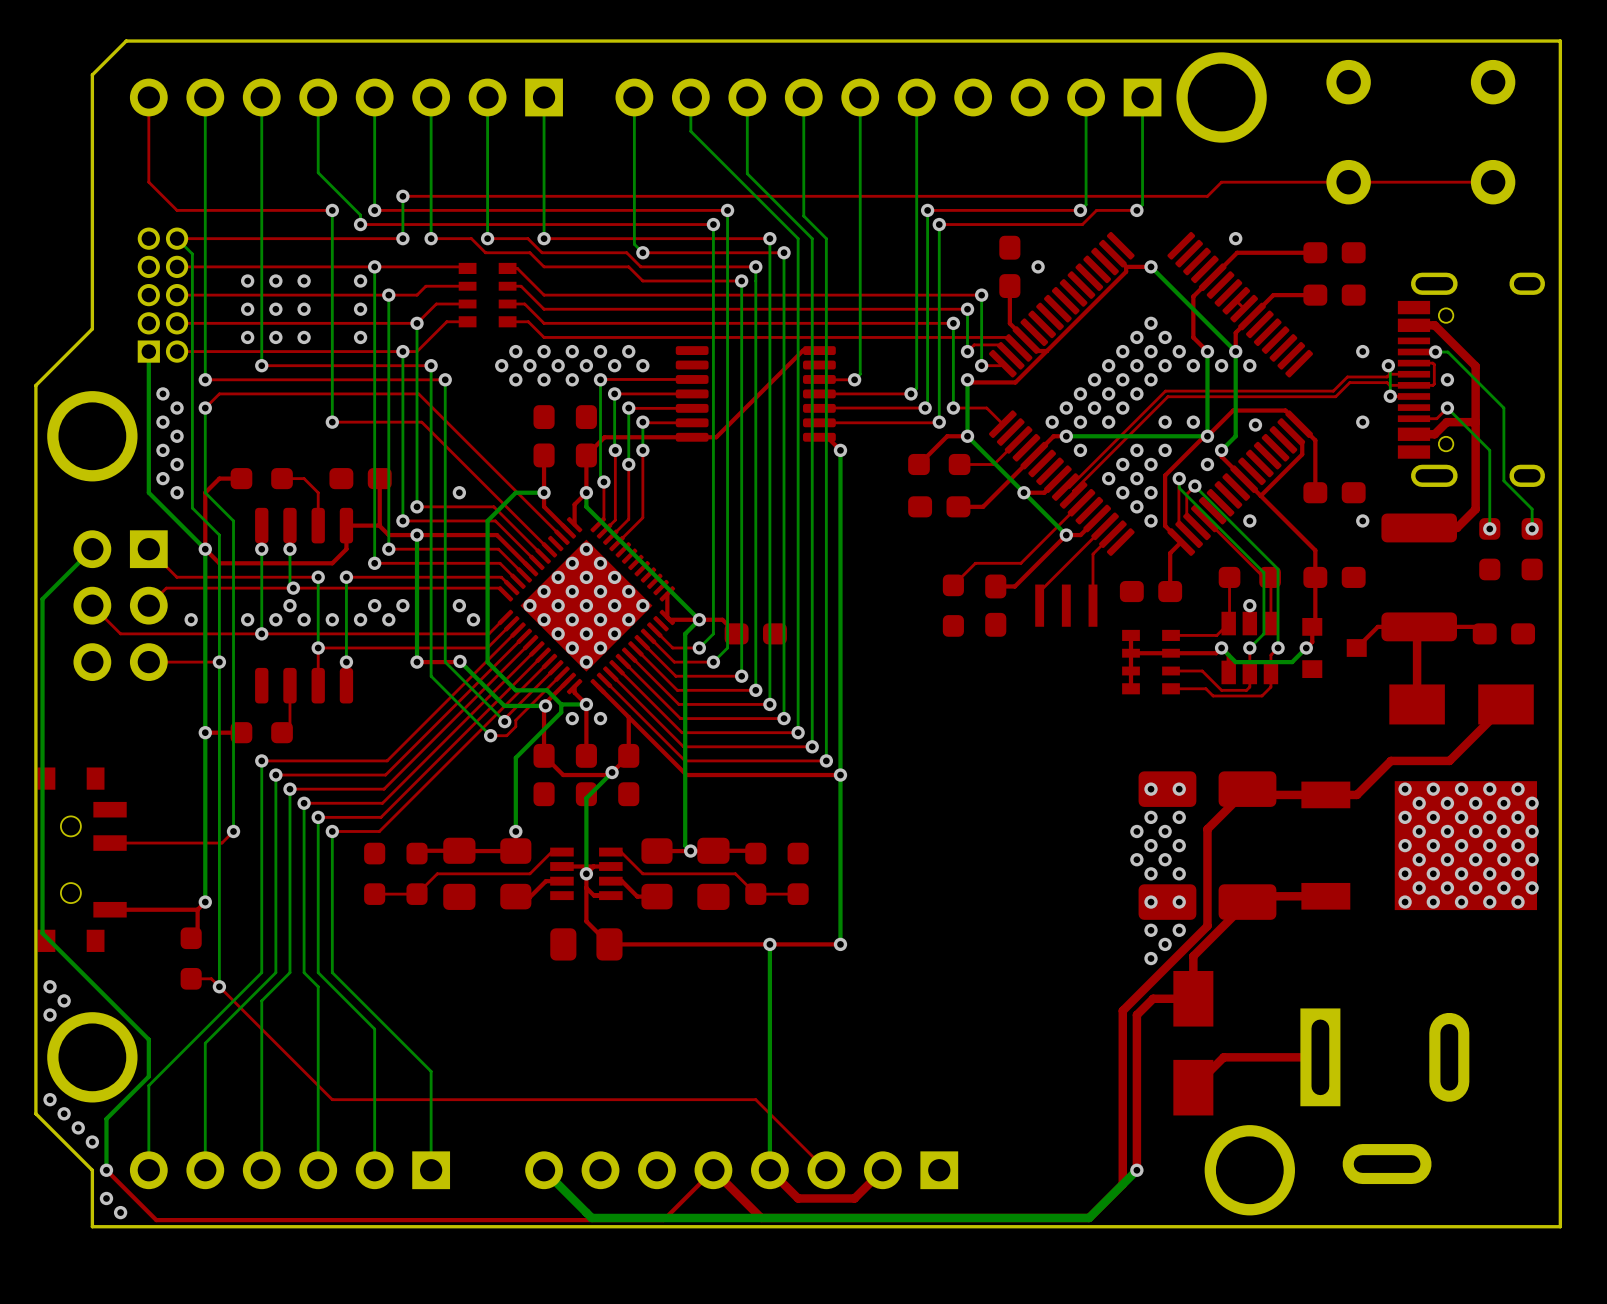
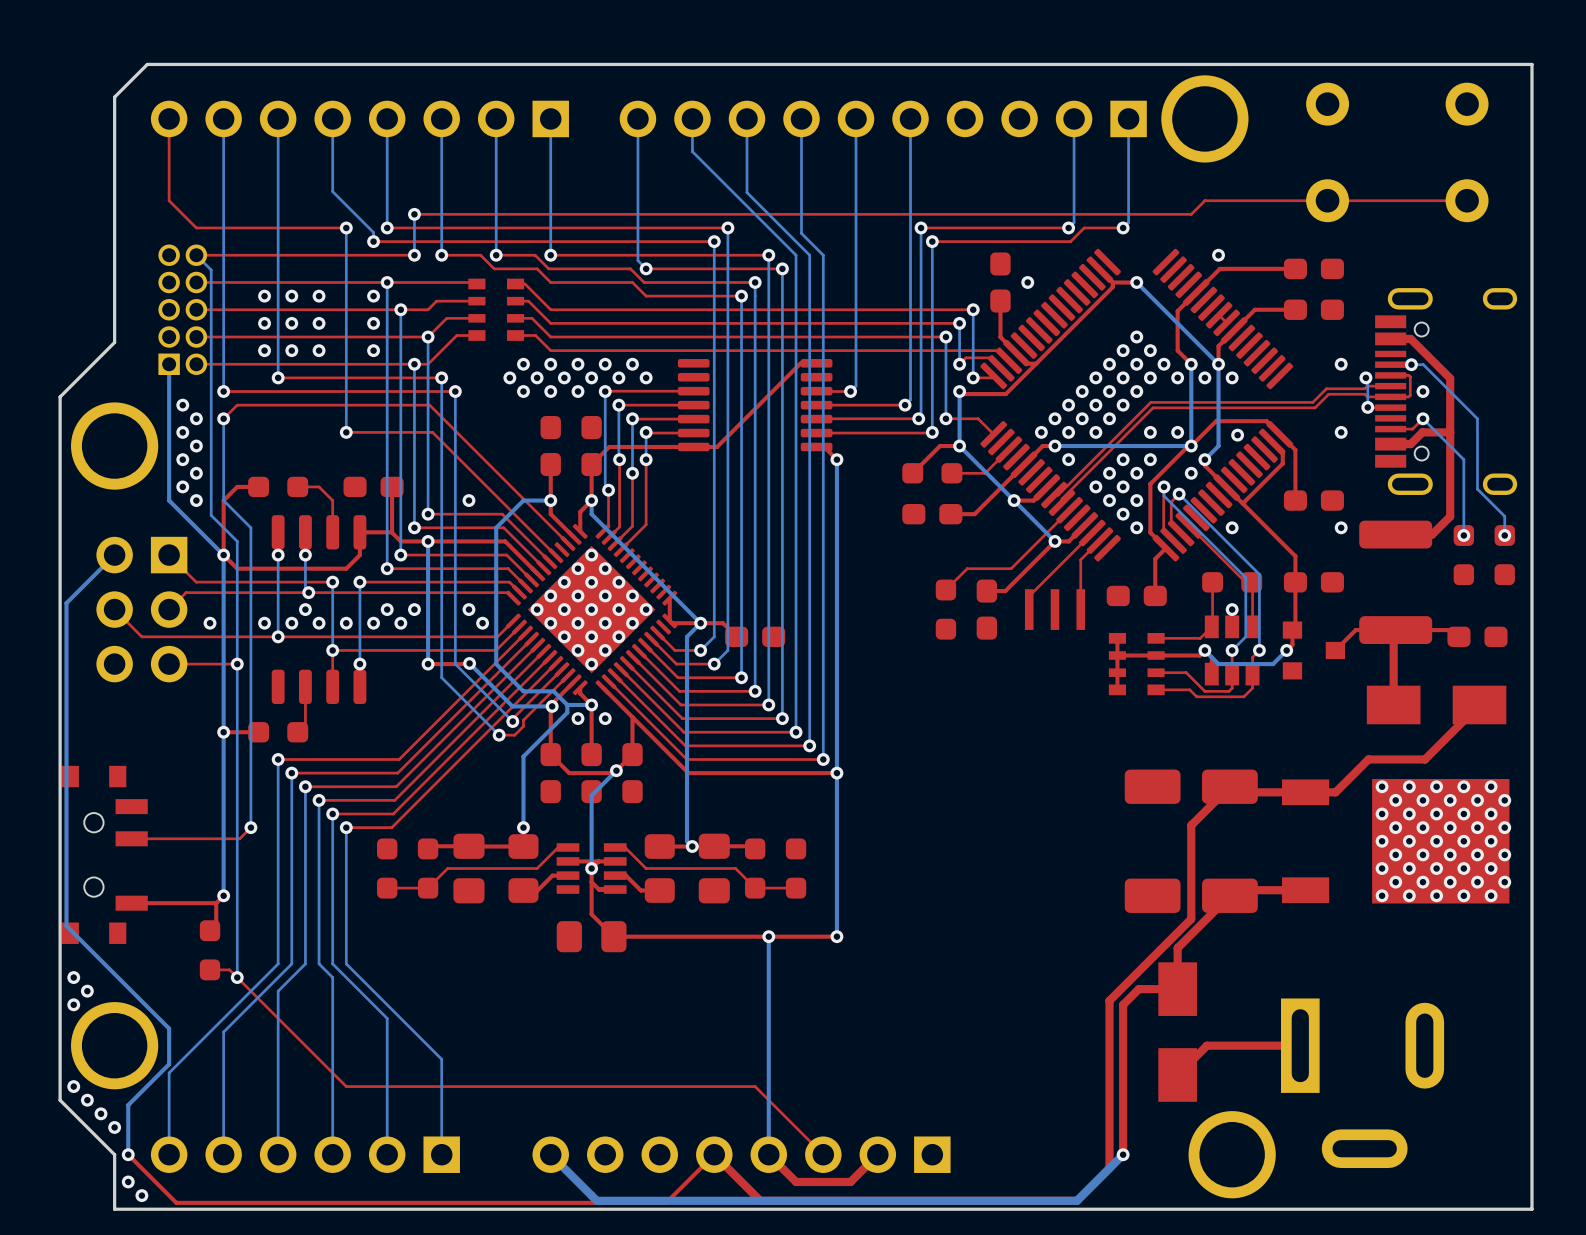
via: (1151, 789) -> none
via: (1179, 789) -> none
via: (1151, 817) -> none
via: (1179, 817) -> none
via: (1136, 831) -> none
via: (1165, 831) -> none
via: (1151, 845) -> none
via: (1179, 845) -> none
via: (1136, 859) -> none
via: (1165, 859) -> none
via: (1151, 873) -> none
via: (1179, 873) -> none
via: (1151, 902) -> none
via: (1179, 902) -> none
via: (1151, 930) -> none
via: (1179, 930) -> none
via: (1165, 944) -> none
via: (1151, 958) -> none

